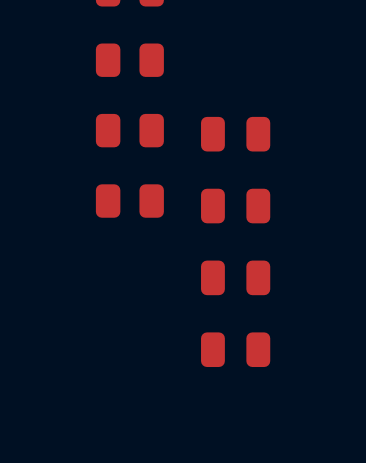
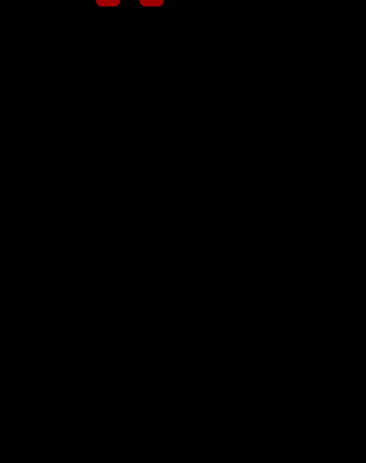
part: (129, 60) -> none
part: (129, 130) -> none
part: (235, 134) -> none
part: (129, 201) -> none
part: (235, 206) -> none
part: (235, 277) -> none
part: (235, 349) -> none

